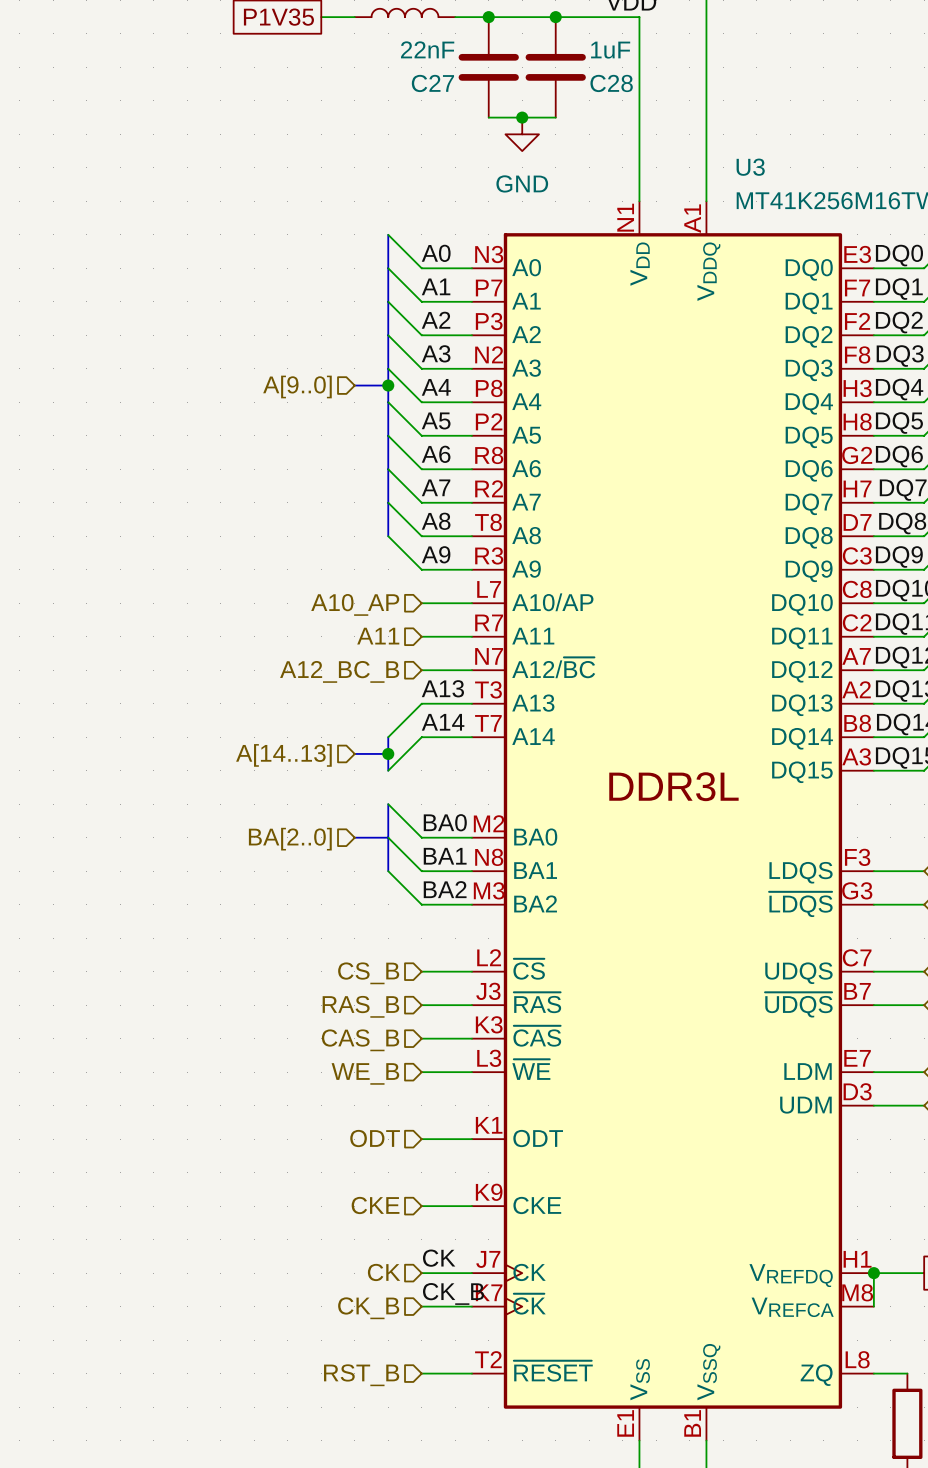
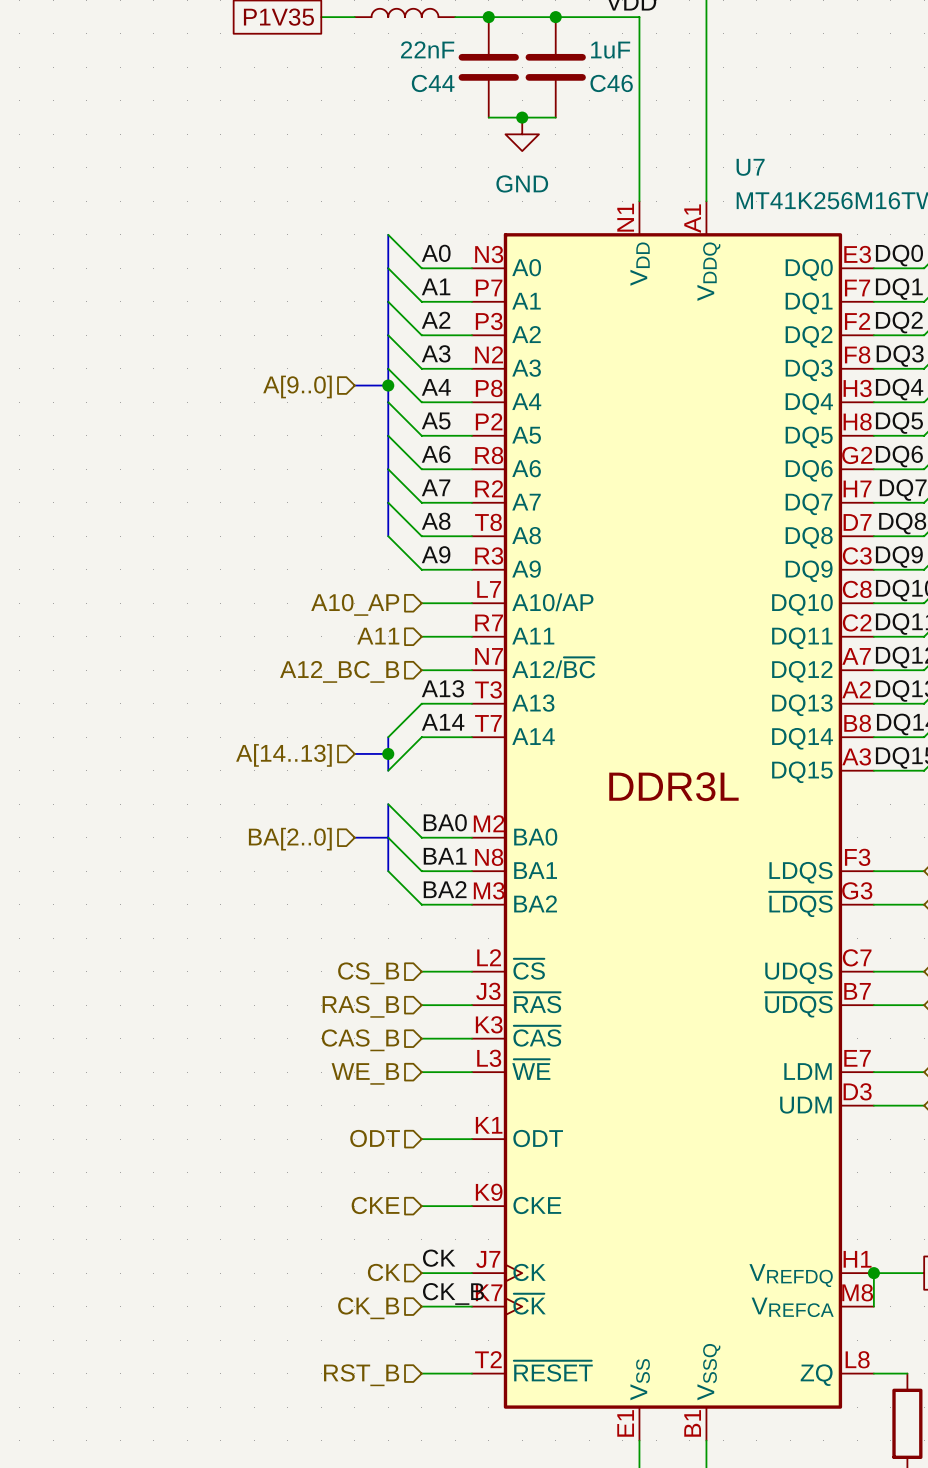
C27 name: C27 (432, 83) -> C44 (433, 83)
C28 name: C28 (611, 83) -> C46 (611, 83)
U3 name: U3 (750, 167) -> U7 (750, 167)

